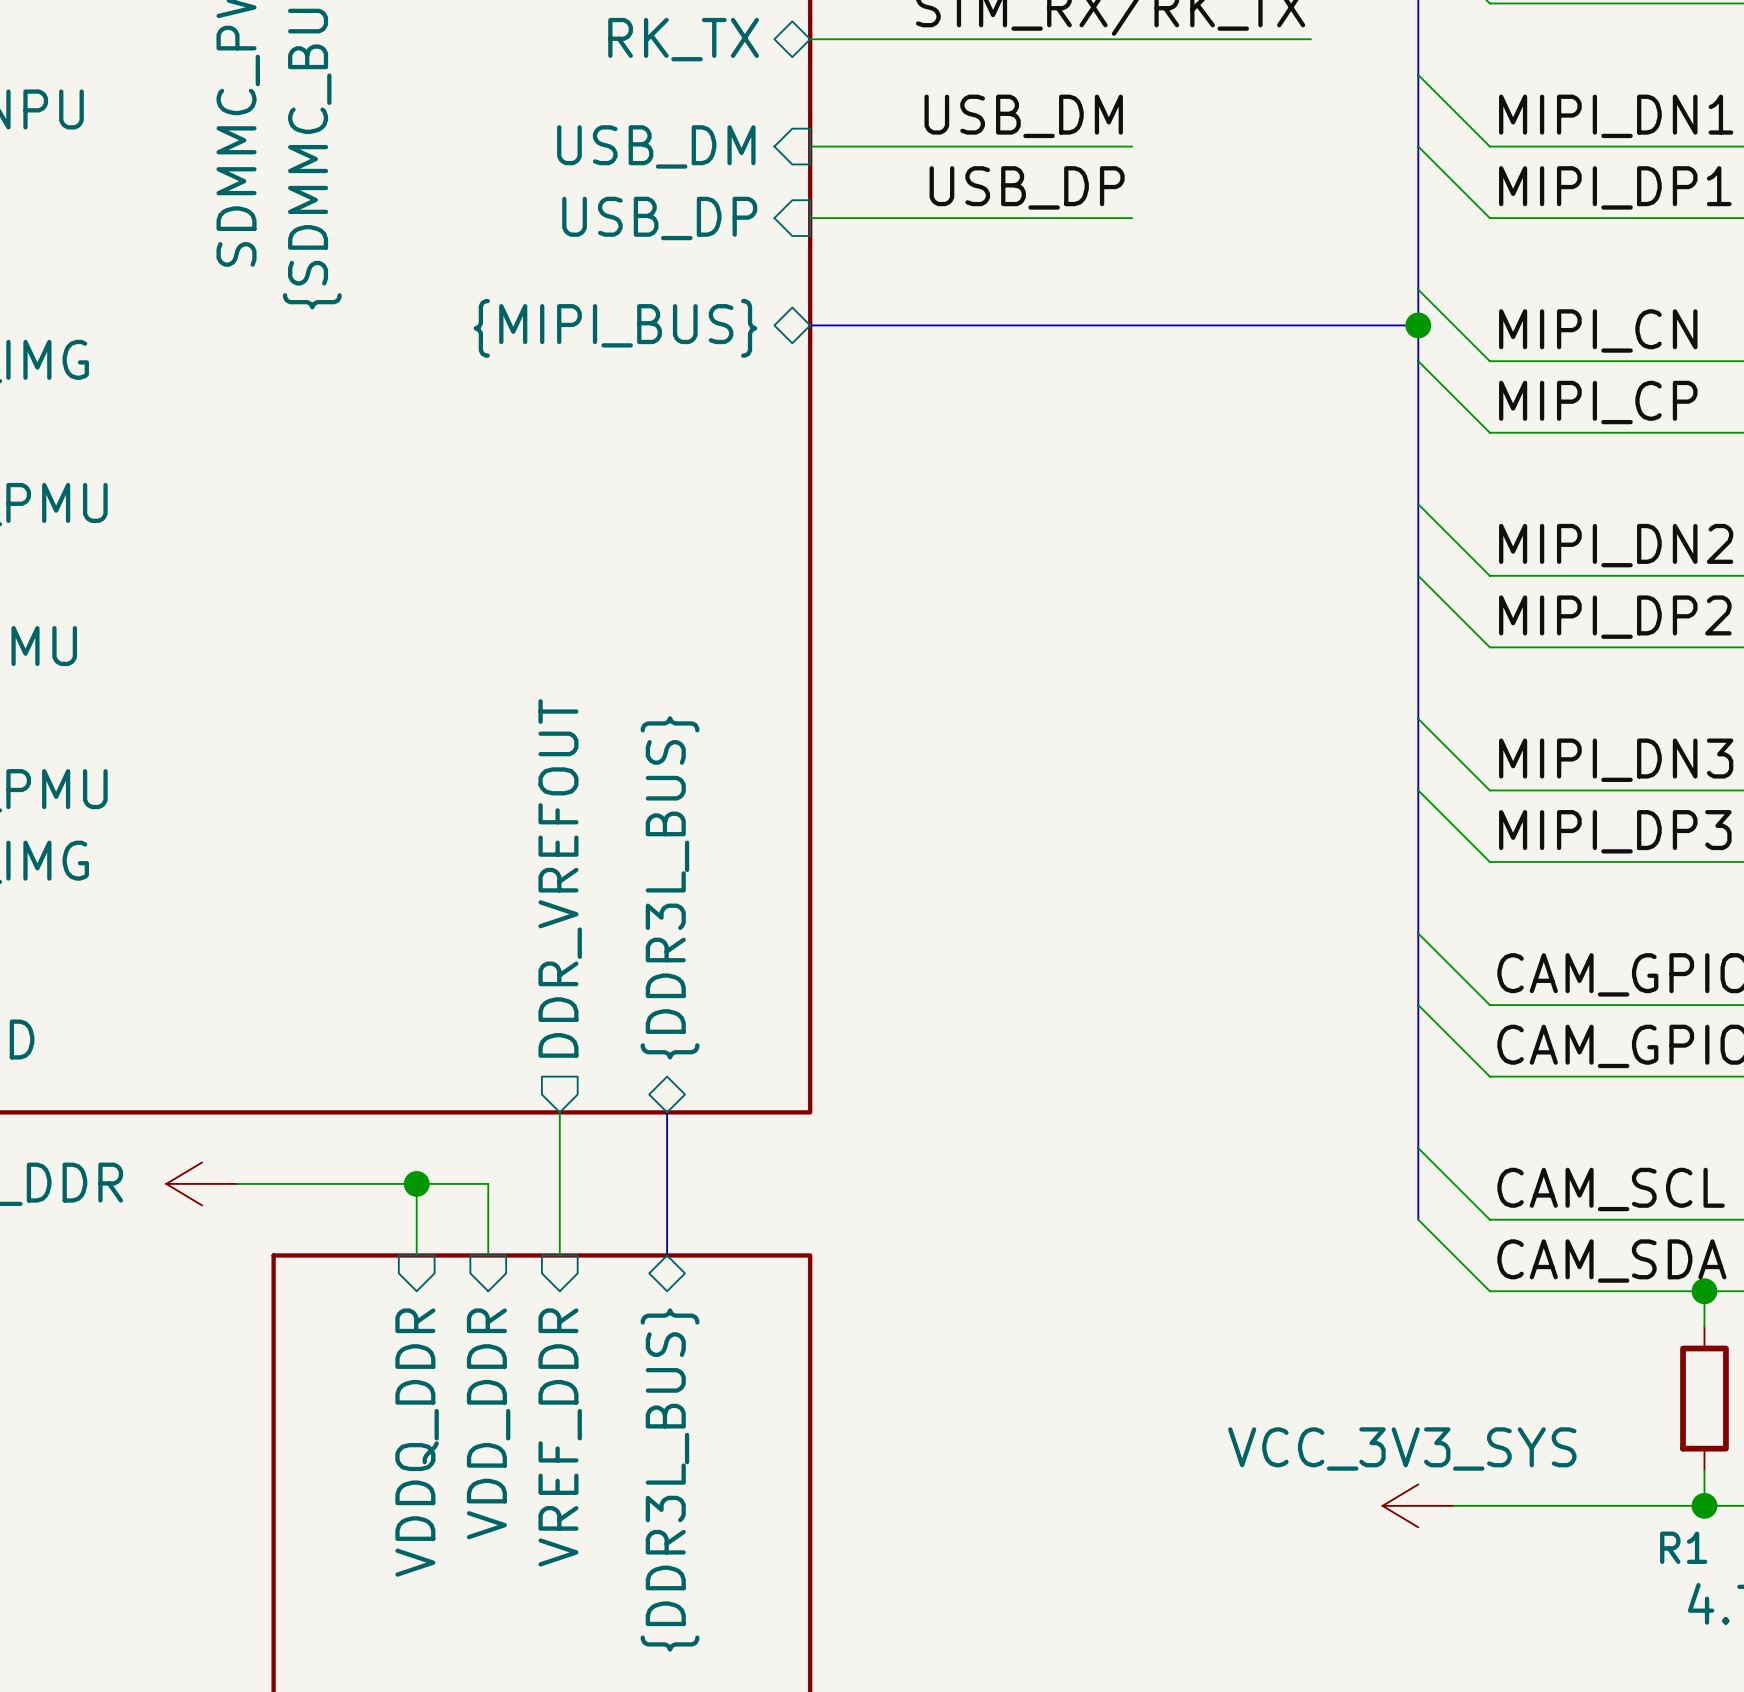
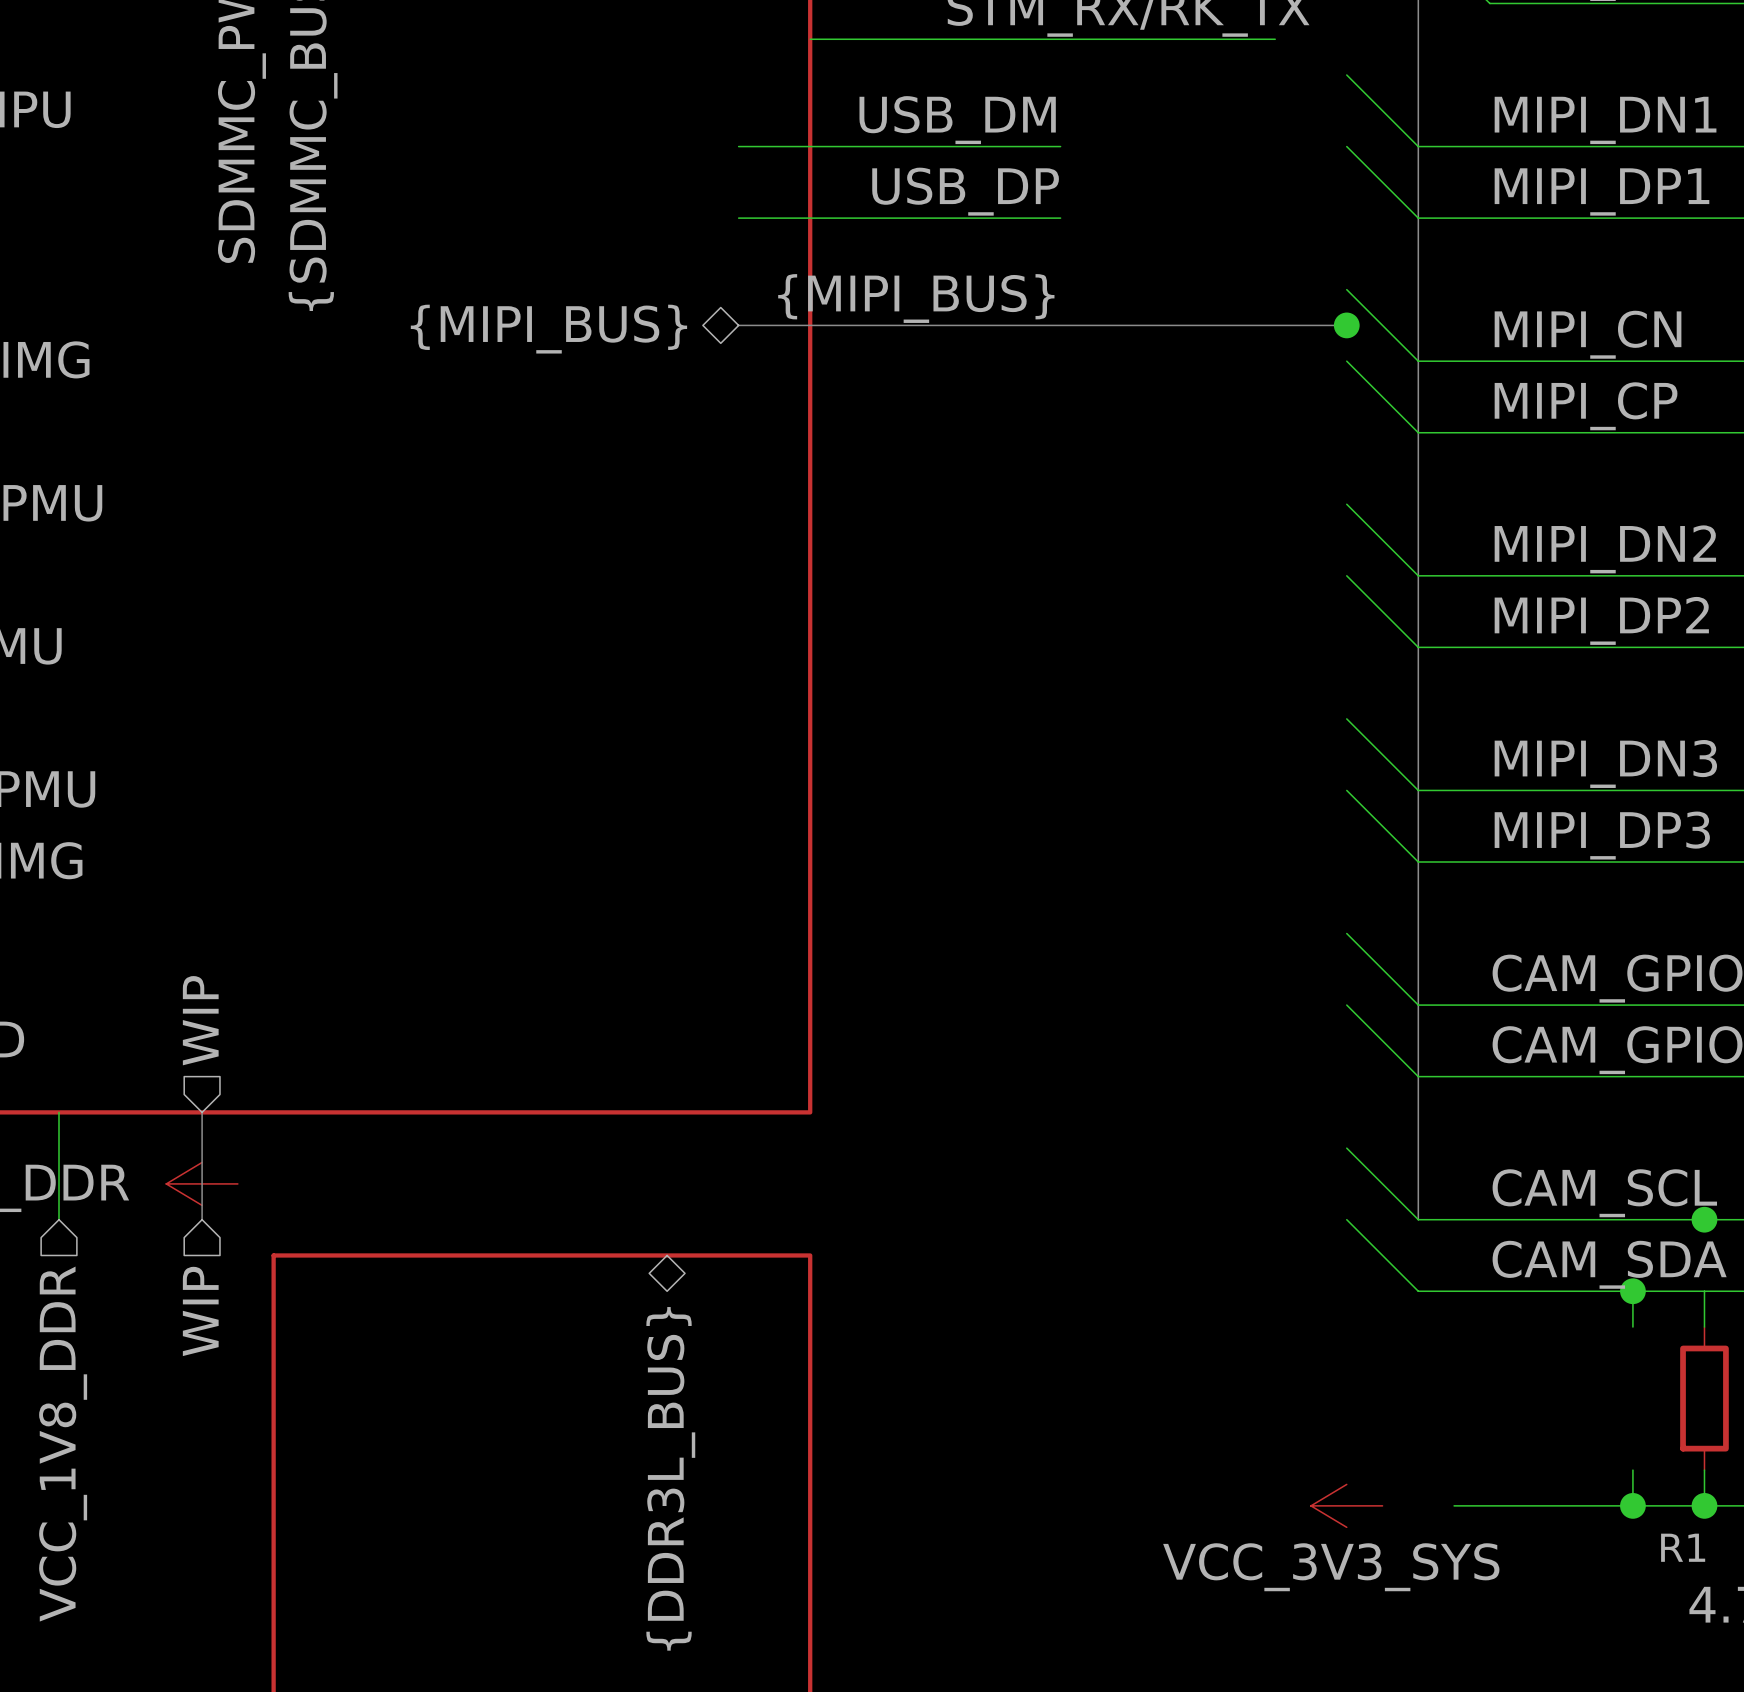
sheet pin: RK_TX (683, 39) -> none
wire: (1275, 39) (1311, 39) -> none
wire: (1418, 75) (1489, 146) -> (1346, 75) (1418, 146) (1489, 146)
label position: USB_DM (1023, 116) -> USB_DM (957, 120)
sheet pin: USB_DM (656, 146) -> none
wire: (1060, 146) (1132, 146) -> (738, 146) (810, 146)
wire: (1418, 146) (1489, 218) -> (1346, 146) (1418, 218) (1489, 218)
label position: USB_DP (1027, 187) -> USB_DP (965, 191)
sheet pin: USB_DP (659, 218) -> none
wire: (1060, 218) (1132, 218) -> (738, 218) (810, 218)
wire: (1418, 289) (1489, 361) -> (1346, 289) (1418, 361) (1489, 361)
label: none -> {MIPI_BUS} (916, 298)
bus: (1346, 325) (1418, 325) -> (738, 325) (810, 325)
junction position: (1418, 325) -> (1346, 325)
sheet pin position: {MIPI_BUS} (615, 328) -> {MIPI_BUS} (548, 329)
wire: (1418, 361) (1489, 432) -> (1346, 361) (1418, 432) (1489, 432)
wire: (1418, 504) (1489, 575) -> (1346, 504) (1418, 575) (1489, 575)
wire: (1418, 575) (1489, 647) -> (1346, 575) (1418, 647) (1489, 647)
wire: (1418, 718) (1489, 790) -> (1346, 718) (1418, 790) (1489, 790)
wire: (1418, 790) (1489, 861) -> (1346, 790) (1418, 861) (1489, 861)
sheet pin: DDR_VREFOUT (560, 878) -> none
sheet pin: {DDR3L_BUS} (670, 887) -> none
wire: (1418, 933) (1489, 1005) -> (1346, 933) (1418, 1005) (1489, 1005)
wire: (1418, 1005) (1489, 1076) -> (1346, 1005) (1418, 1076) (1489, 1076)
sheet pin: none -> WIP (200, 1020)
wire: none -> (59, 1112) (59, 1219)
bus: none -> (202, 1112) (202, 1219)
wire: (559, 1112) (559, 1255) -> none
bus: (667, 1112) (667, 1255) -> none
wire: (1418, 1148) (1489, 1219) -> (1346, 1148) (1418, 1219) (1489, 1219)
wire: (237, 1183) (488, 1183) (488, 1255) -> none
wire: (416, 1183) (416, 1255) -> none
junction: (416, 1183) -> none
wire: (1418, 1219) (1489, 1291) -> (1346, 1219) (1418, 1291) (1489, 1291)
junction: none -> (1704, 1219)
wire: none -> (1632, 1291) (1632, 1327)
junction: none -> (1632, 1291)
junction: (1704, 1291) -> none
sheet pin: none -> WIP (200, 1311)
sheet pin: VDD_DDR (488, 1423) -> none
sheet pin: VREF_DDR (560, 1437) -> none
sheet pin: VDDQ_DDR (417, 1442) -> none
power symbol text position: VCC_3V3_SYS (1402, 1449) -> VCC_3V3_SYS (1331, 1567)
sheet pin: none -> VCC_1V8_DDR (63, 1444)
wire: none -> (1632, 1470) (1632, 1505)
power symbol position: VCC_3V3_SYS (1418, 1505) -> VCC_3V3_SYS (1346, 1505)
junction: none -> (1632, 1505)

